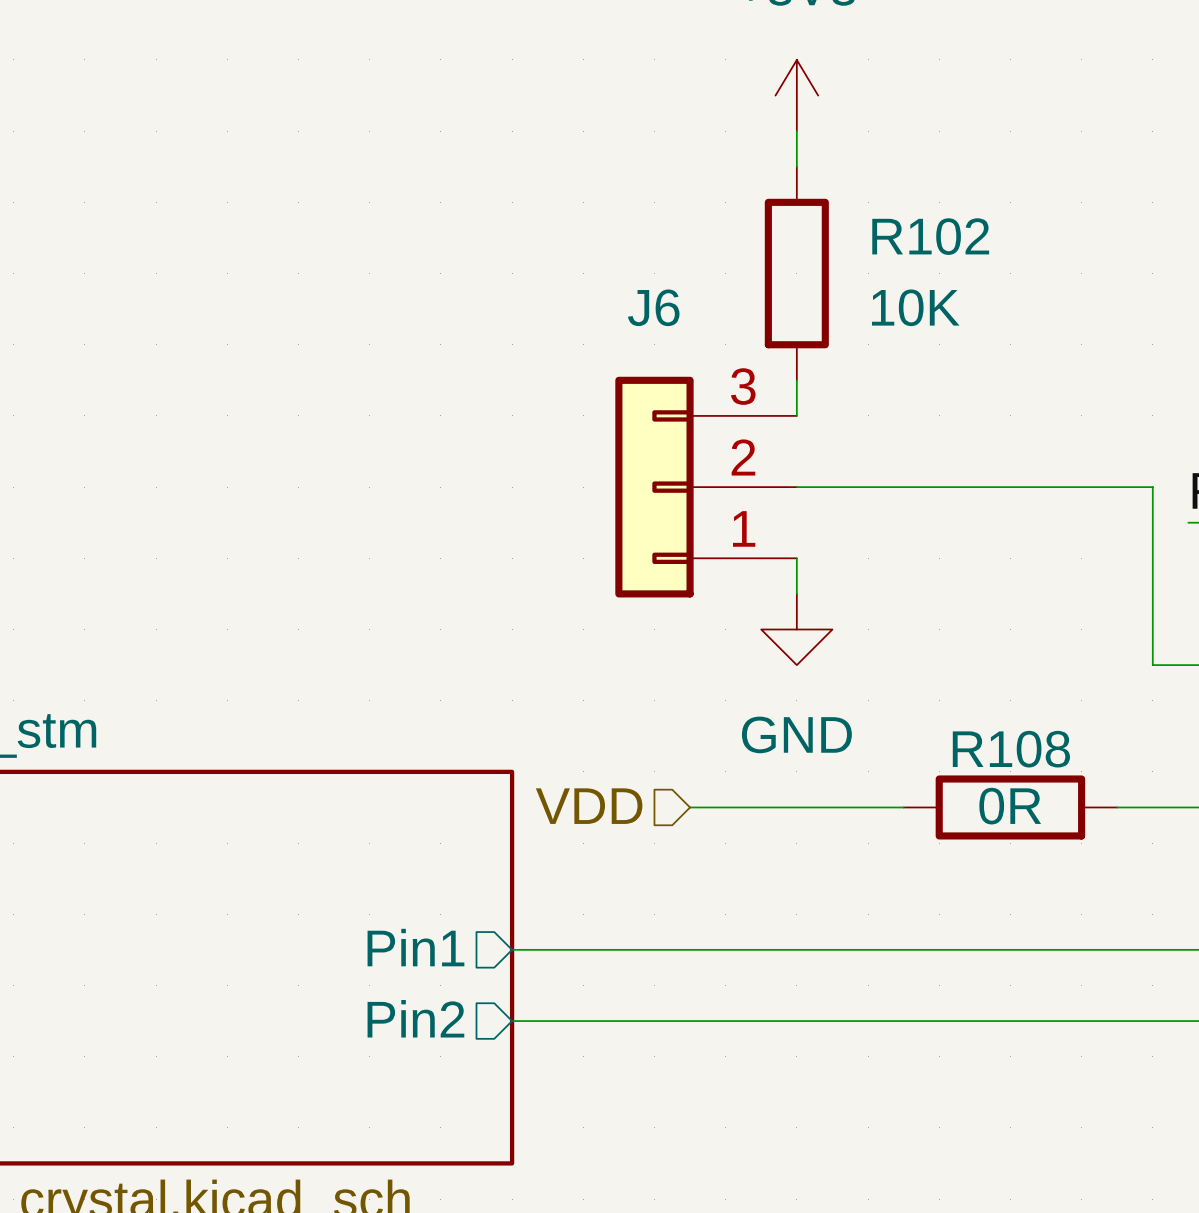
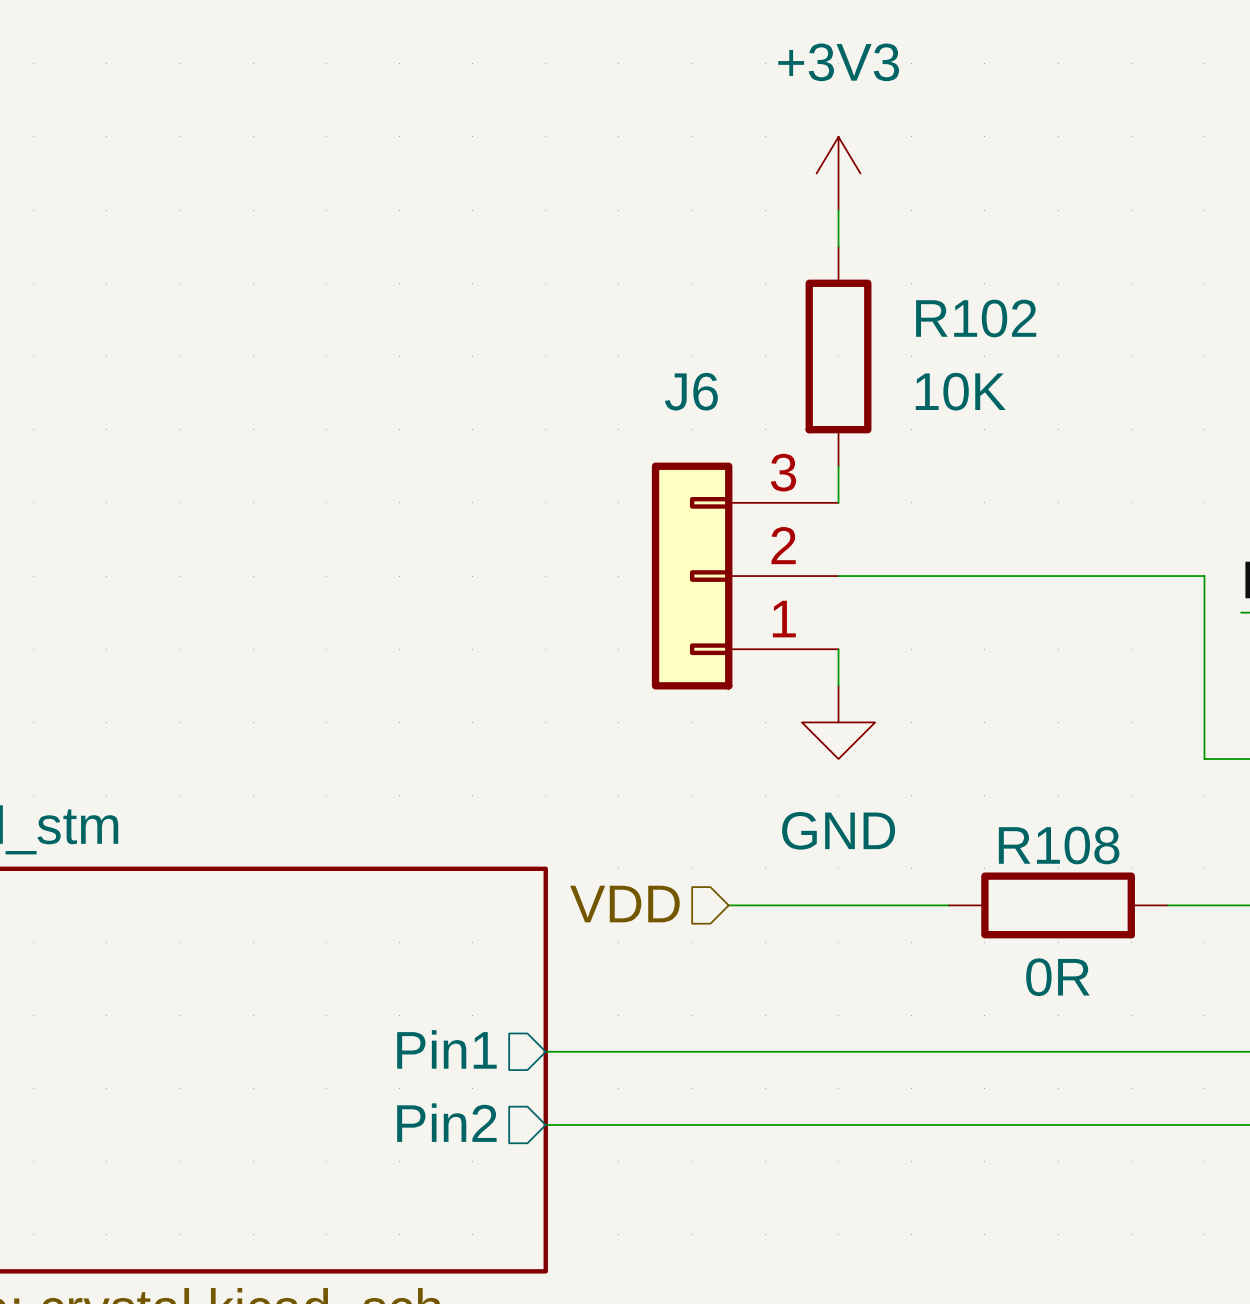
R108 value position: 0R (1010, 806) -> 0R (1057, 977)

